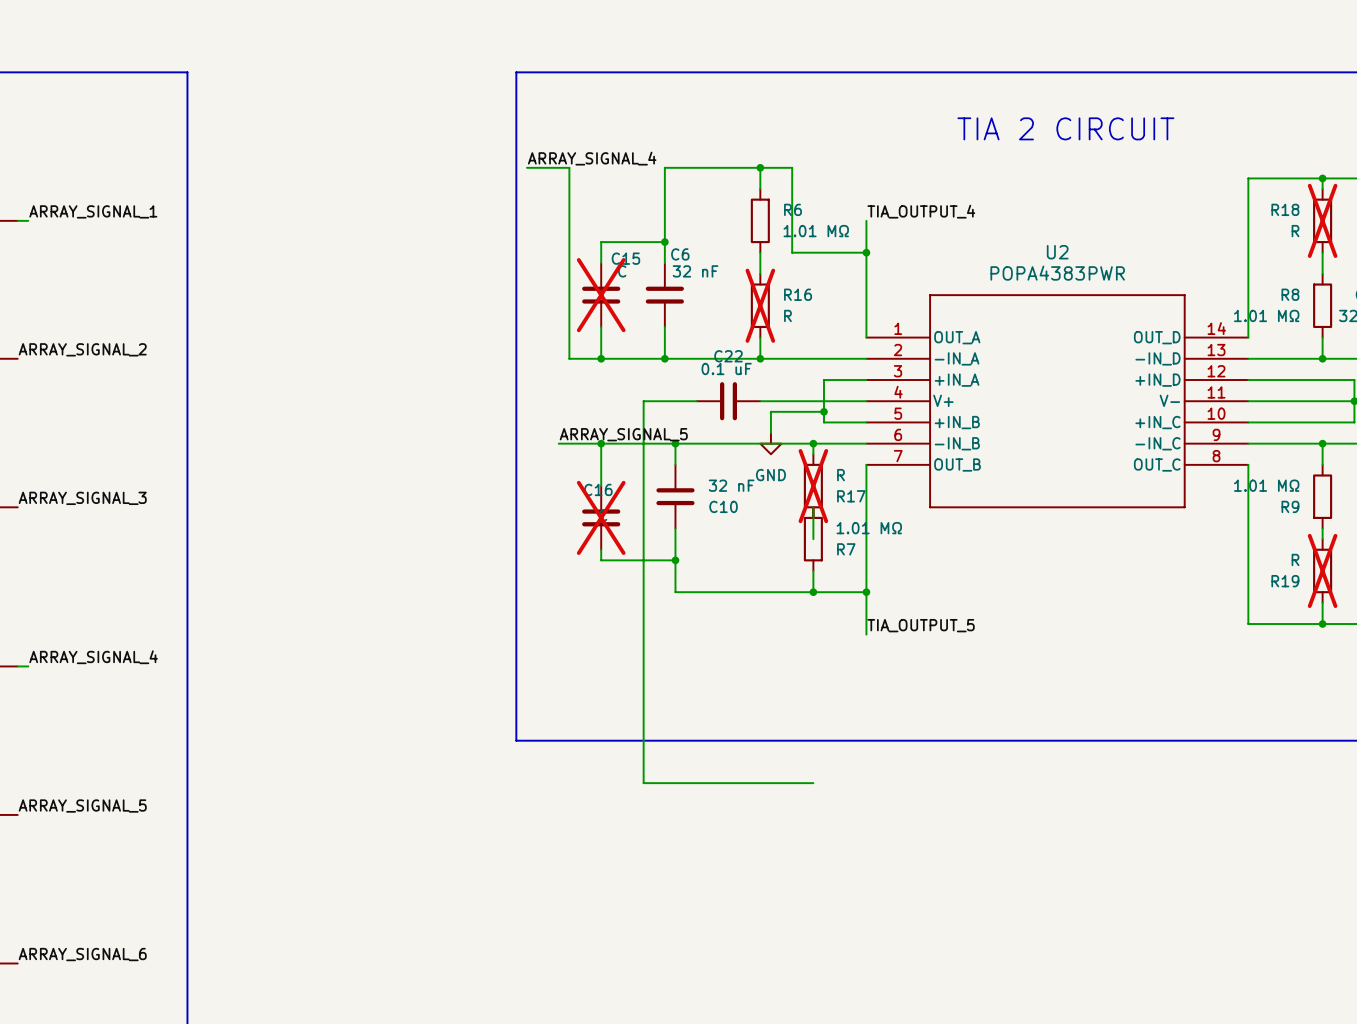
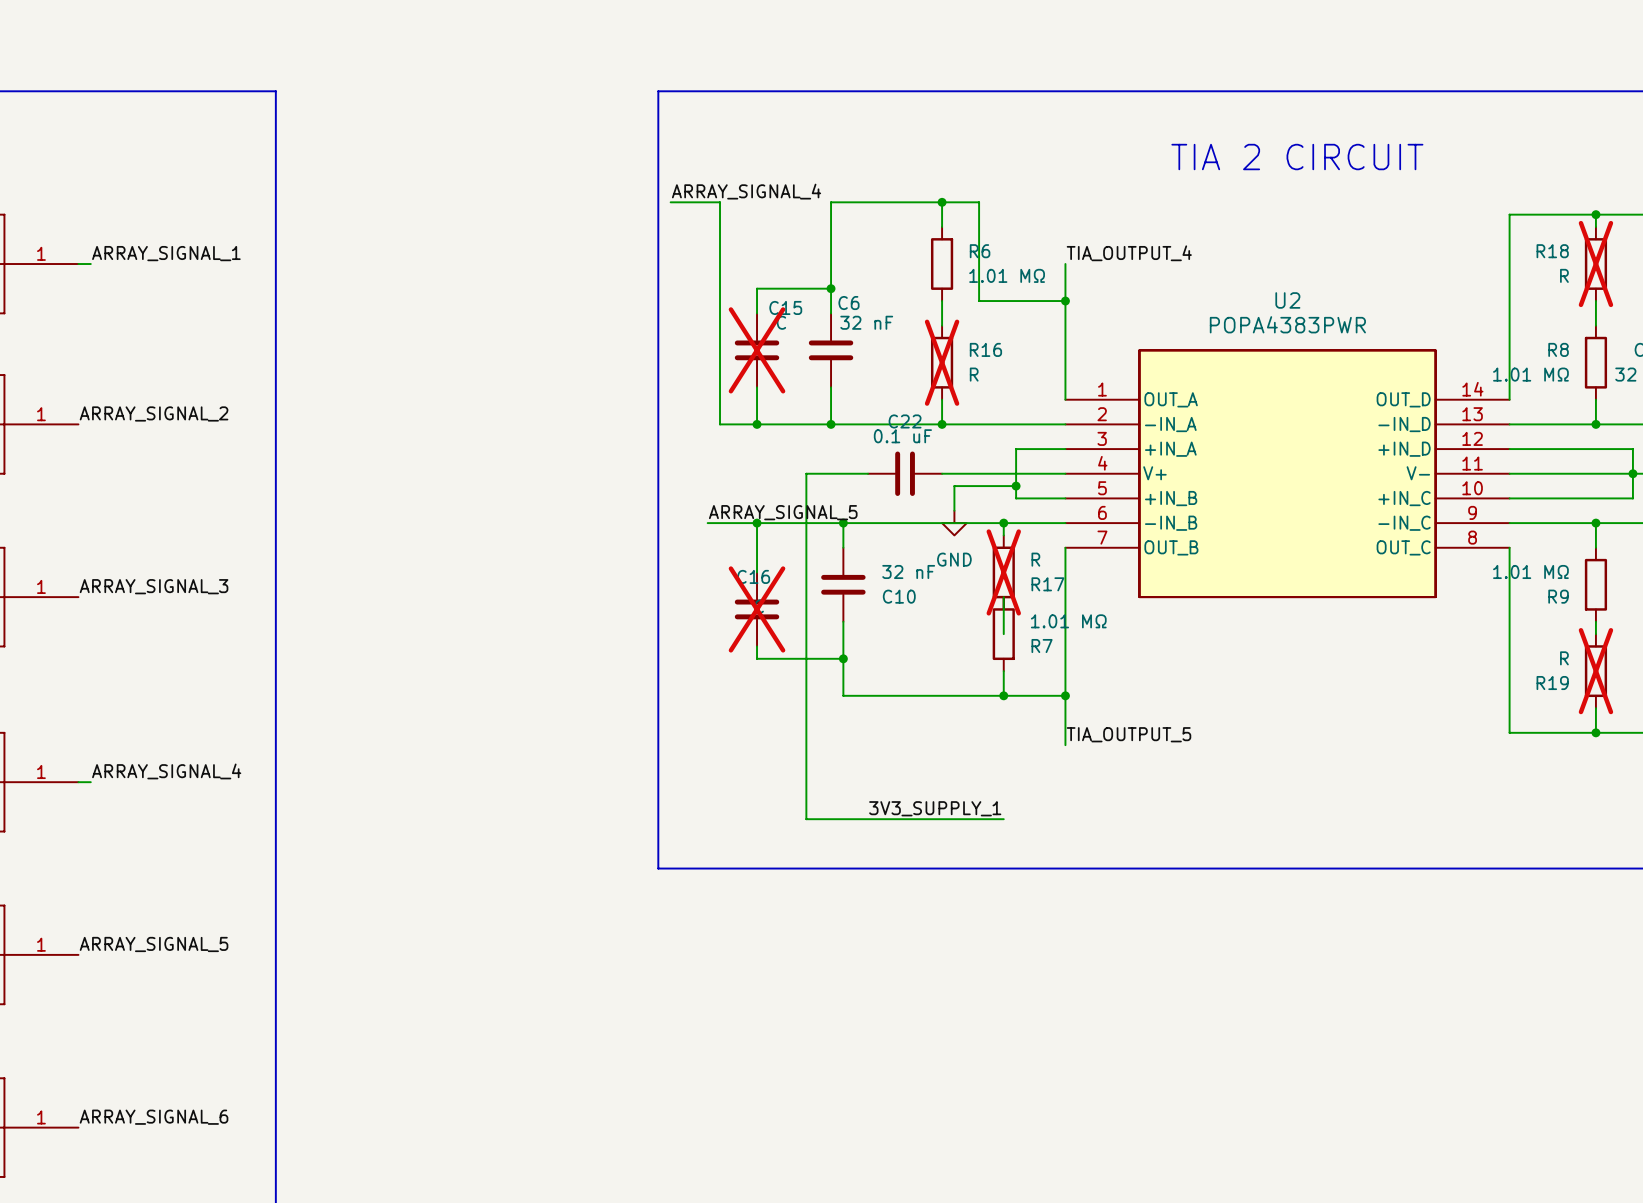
U2 symbol: [866, 294, 1249, 508] -> [1065, 349, 1510, 598]
label: none -> 3V3_SUPPLY_1 (935, 808)
wire: (643, 698) (643, 783) (813, 783) -> (806, 819) (1003, 819)

